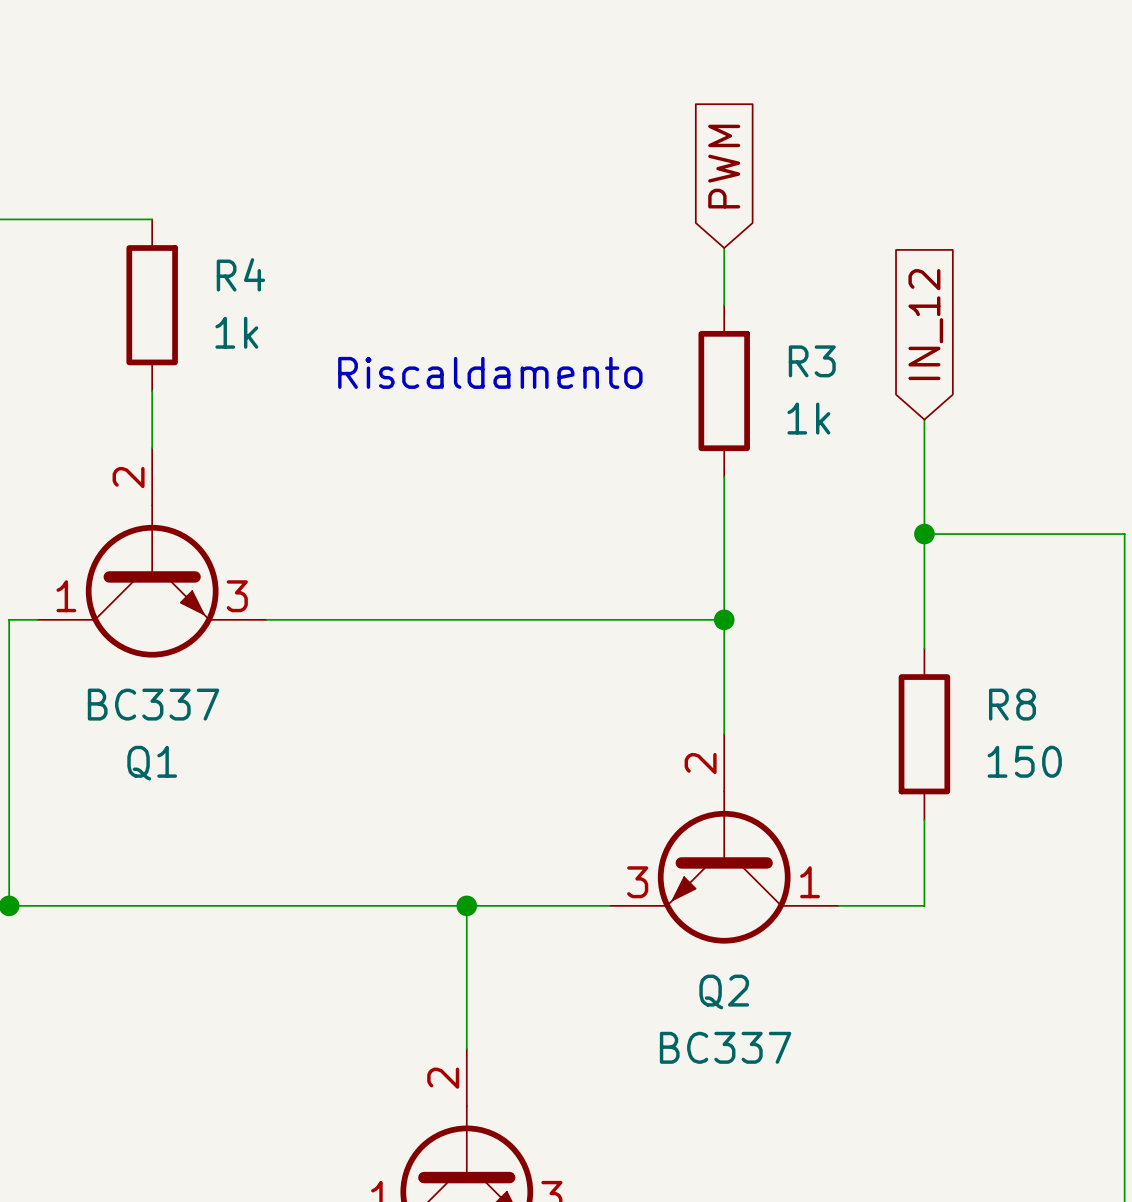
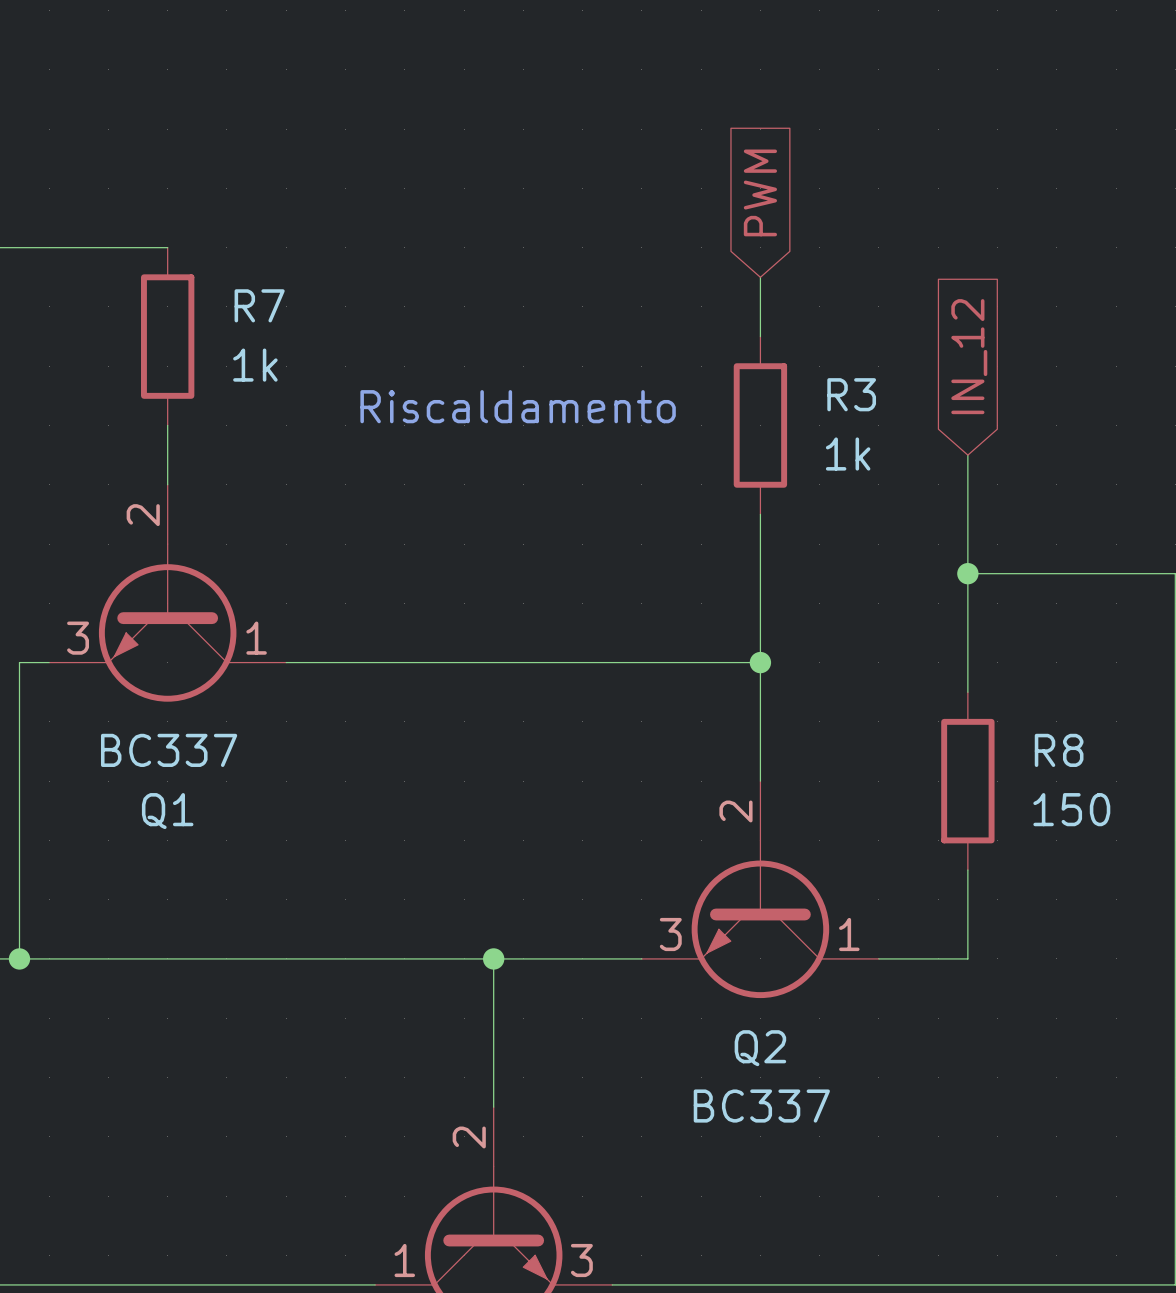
R4 name: R4 (240, 274) -> R7 (259, 305)
Q1 flip: as is (152, 581) -> left-right (167, 622)

